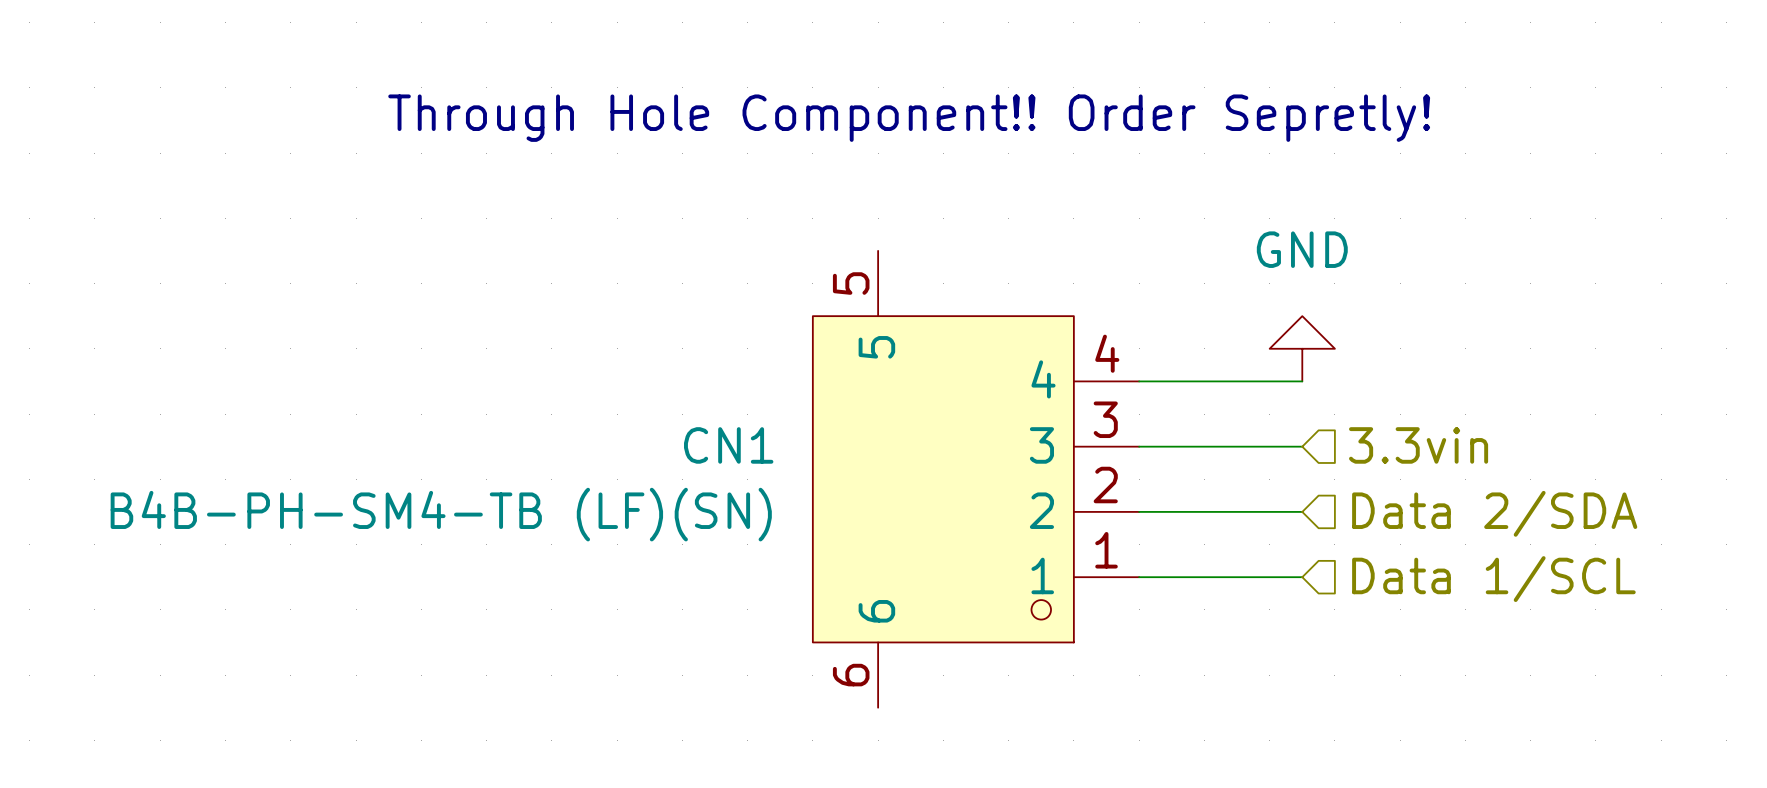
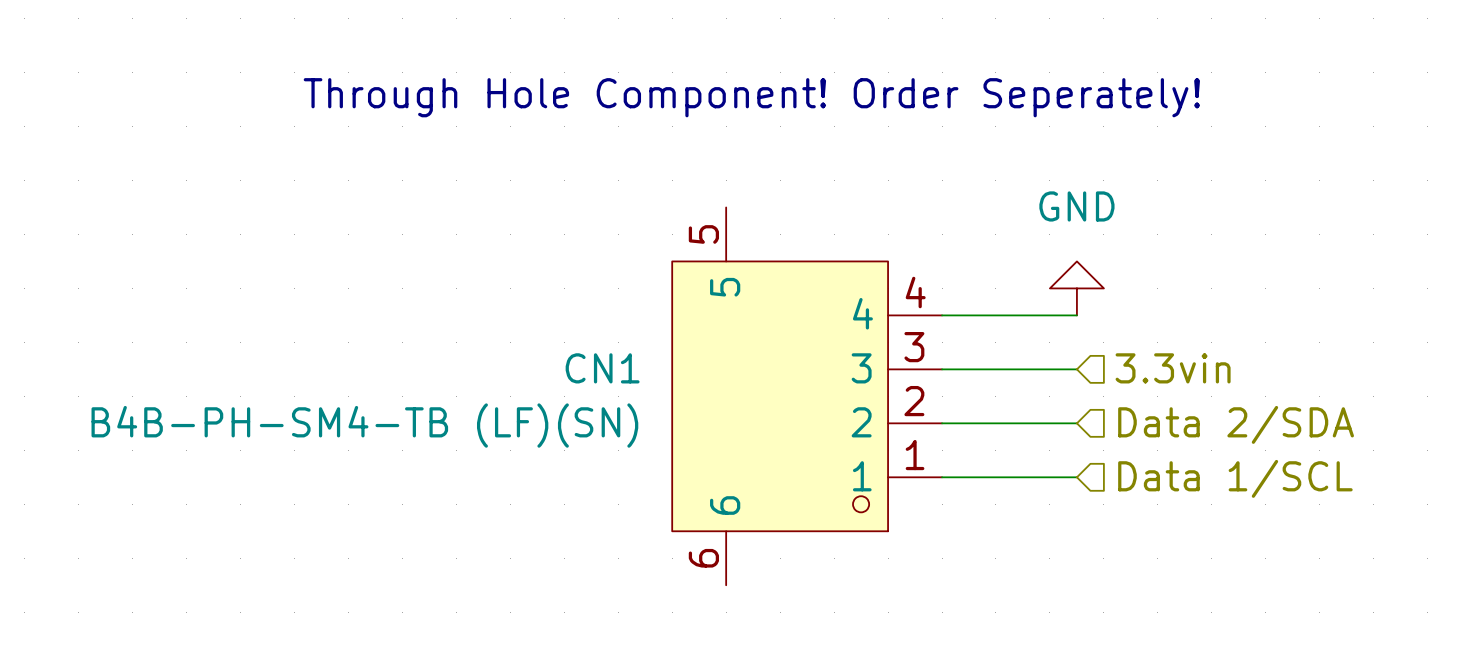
text: Through Hole Component!! Order Sepretly! (909, 118) -> Through Hole Component! Order Seperately! (751, 97)

